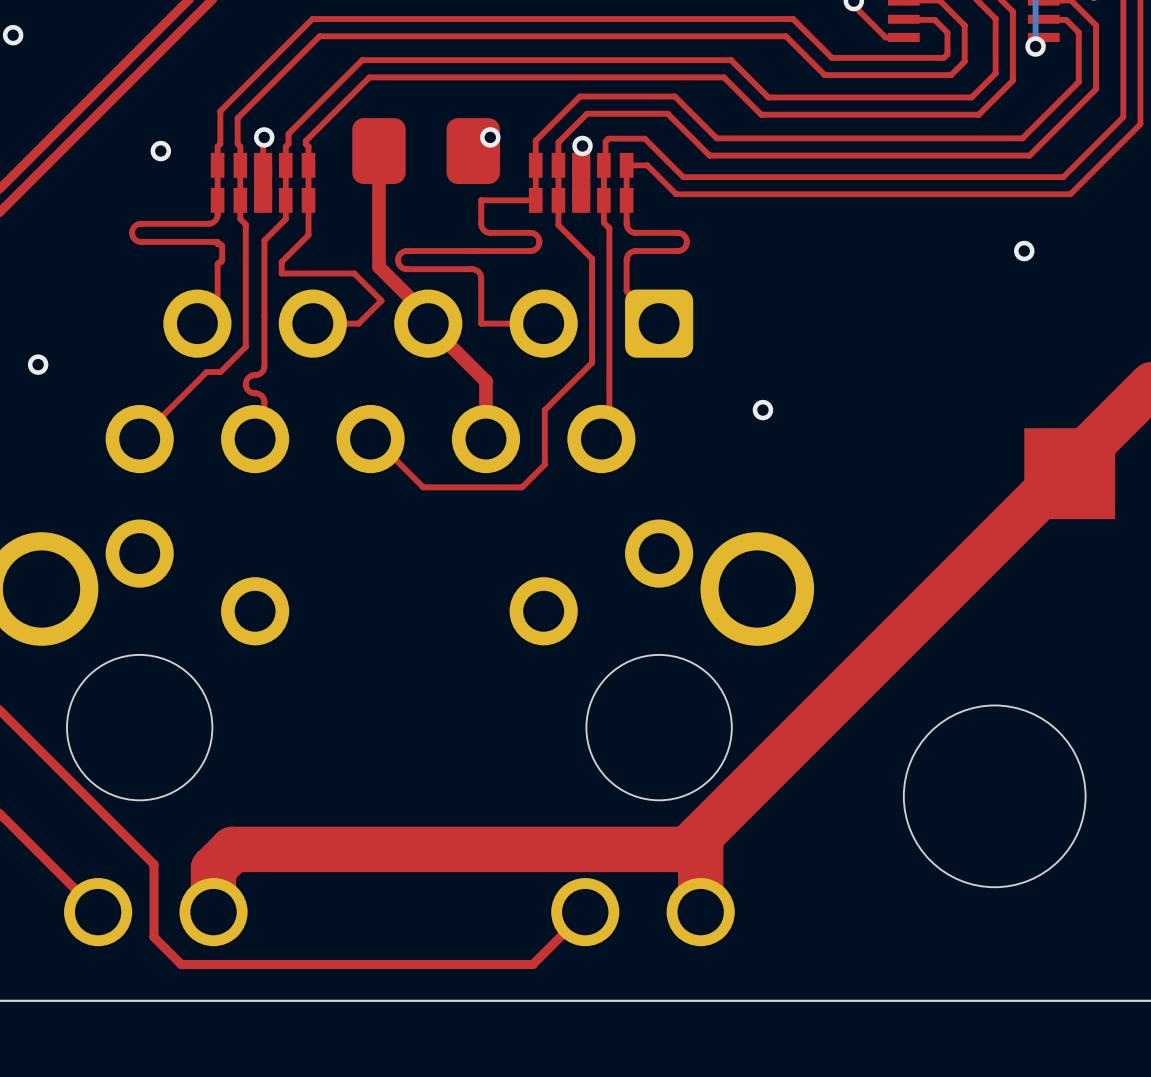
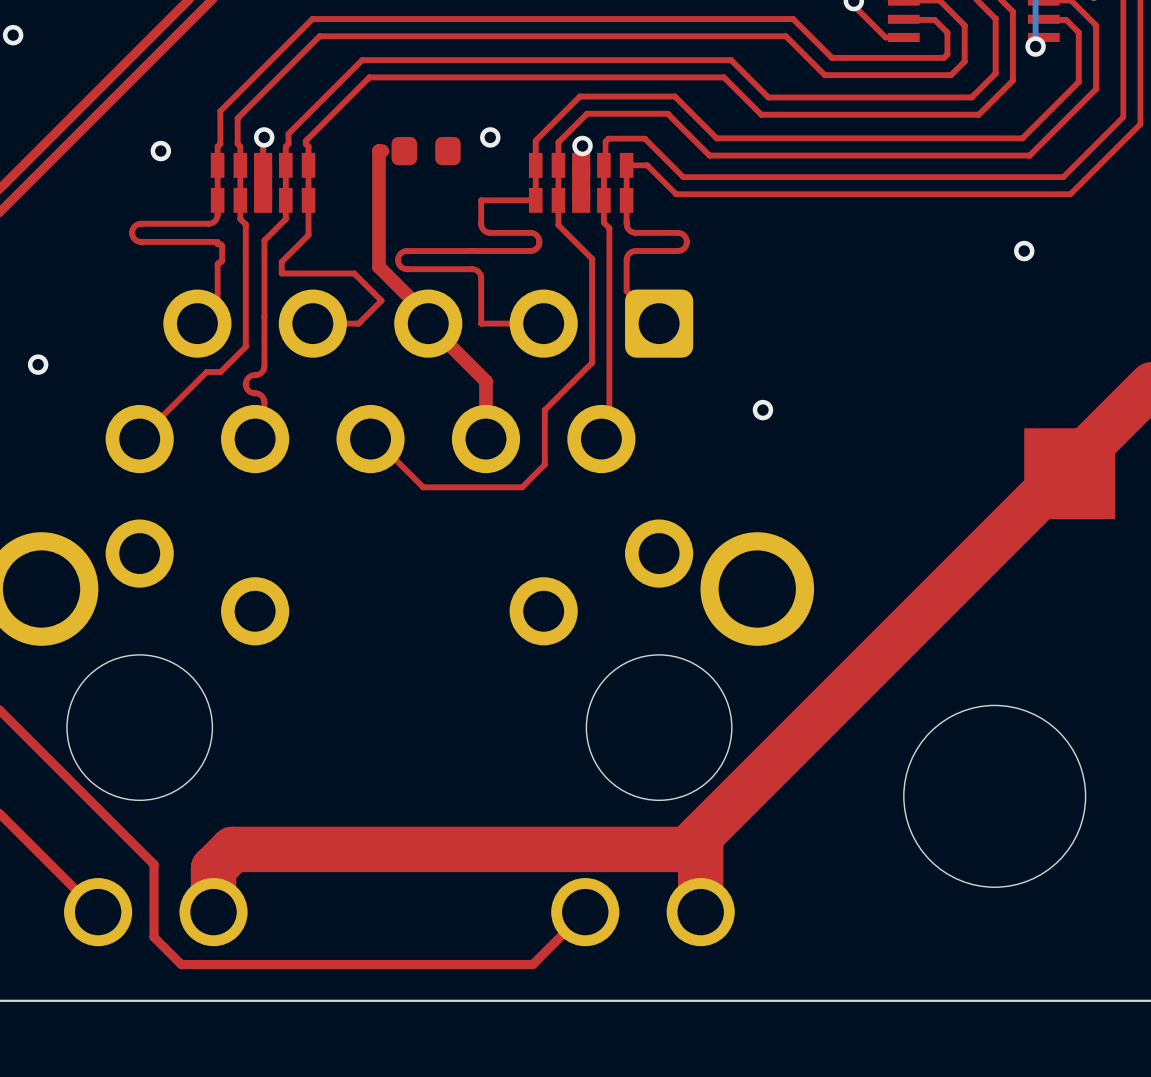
part footprint: [352, 118, 500, 185] -> [391, 136, 461, 166]

